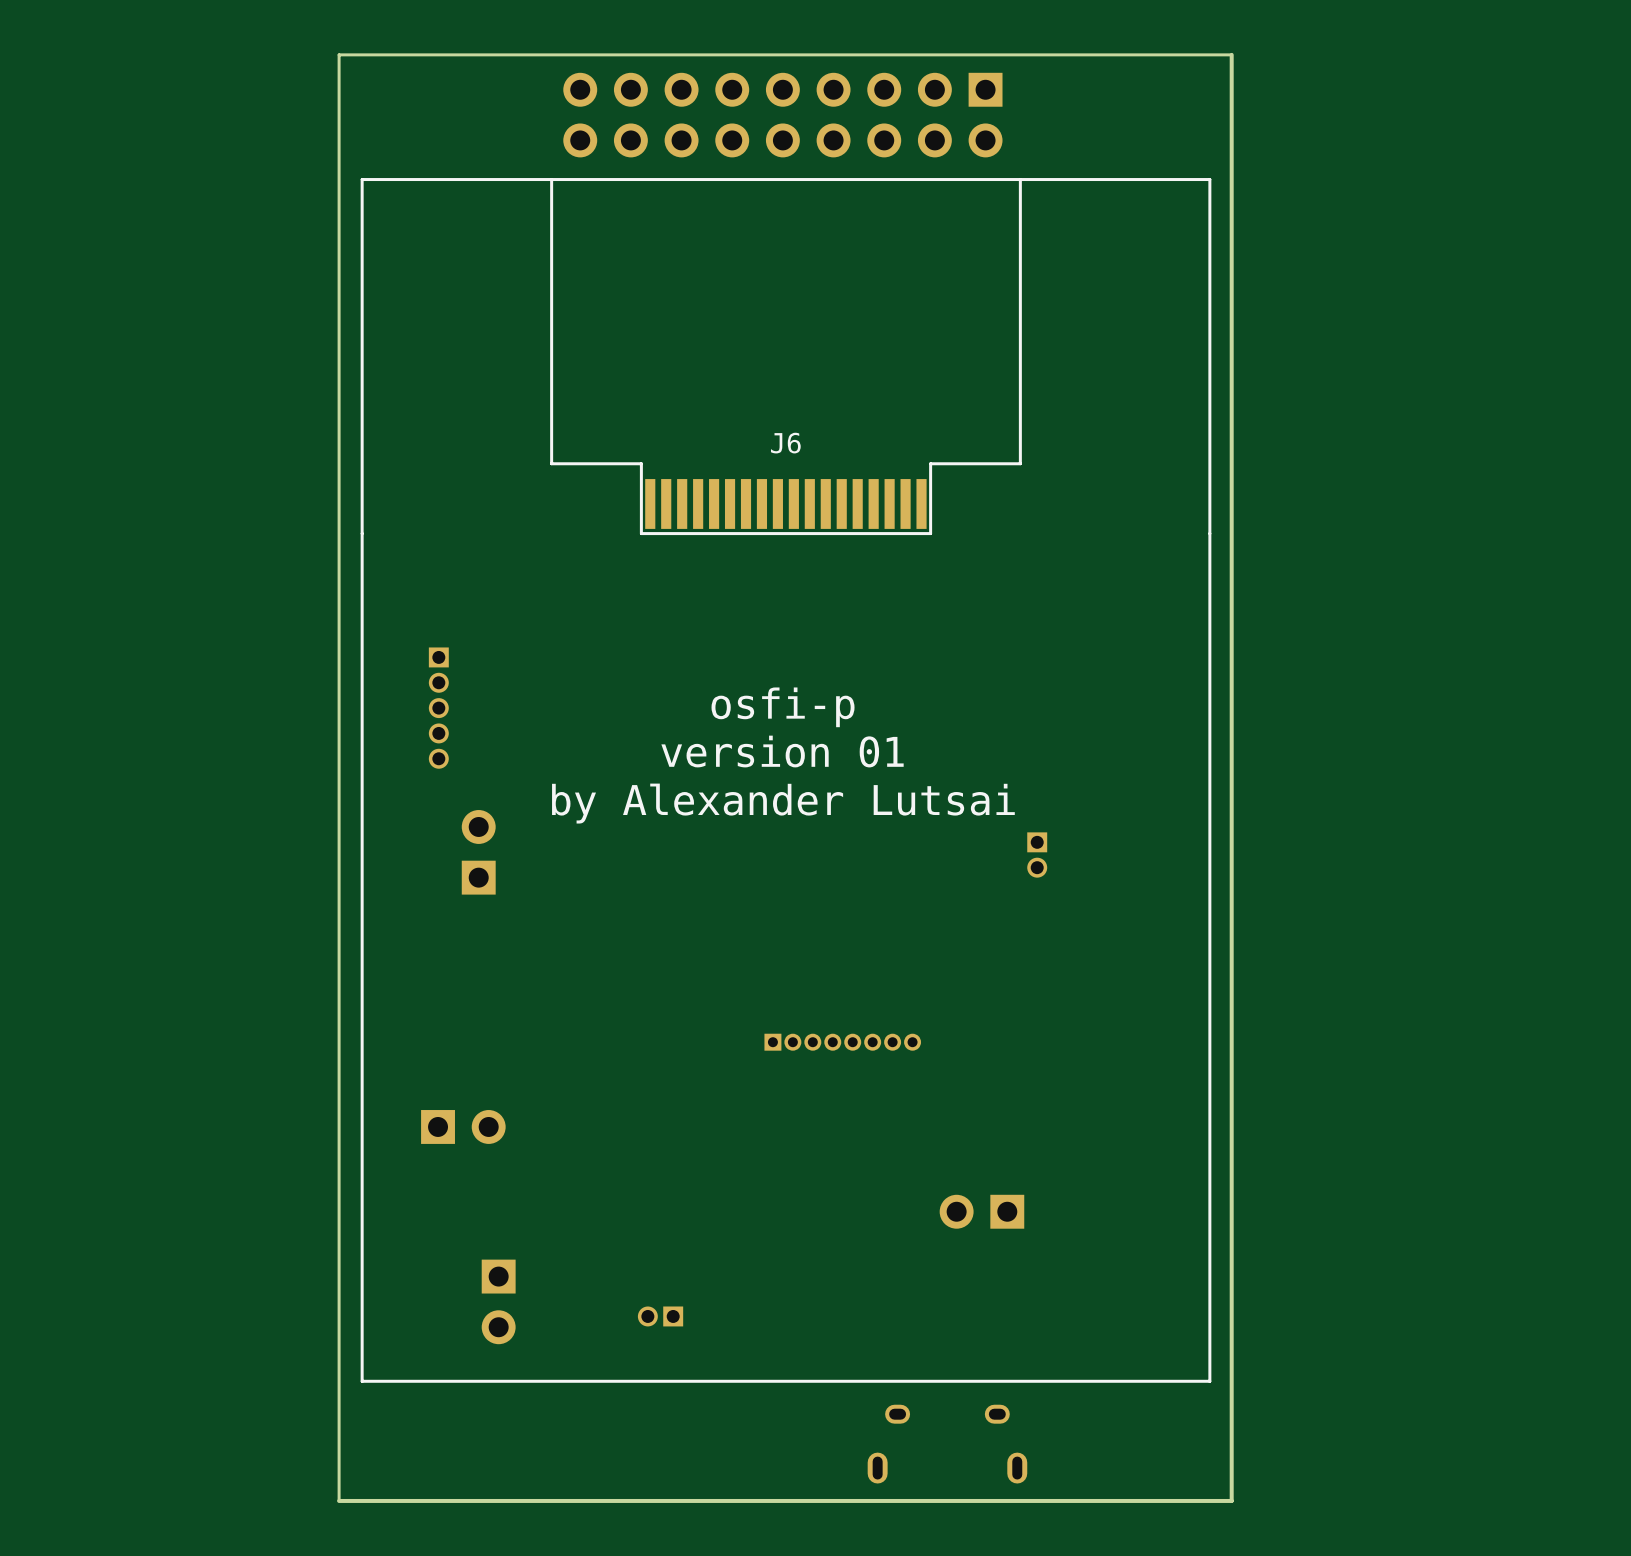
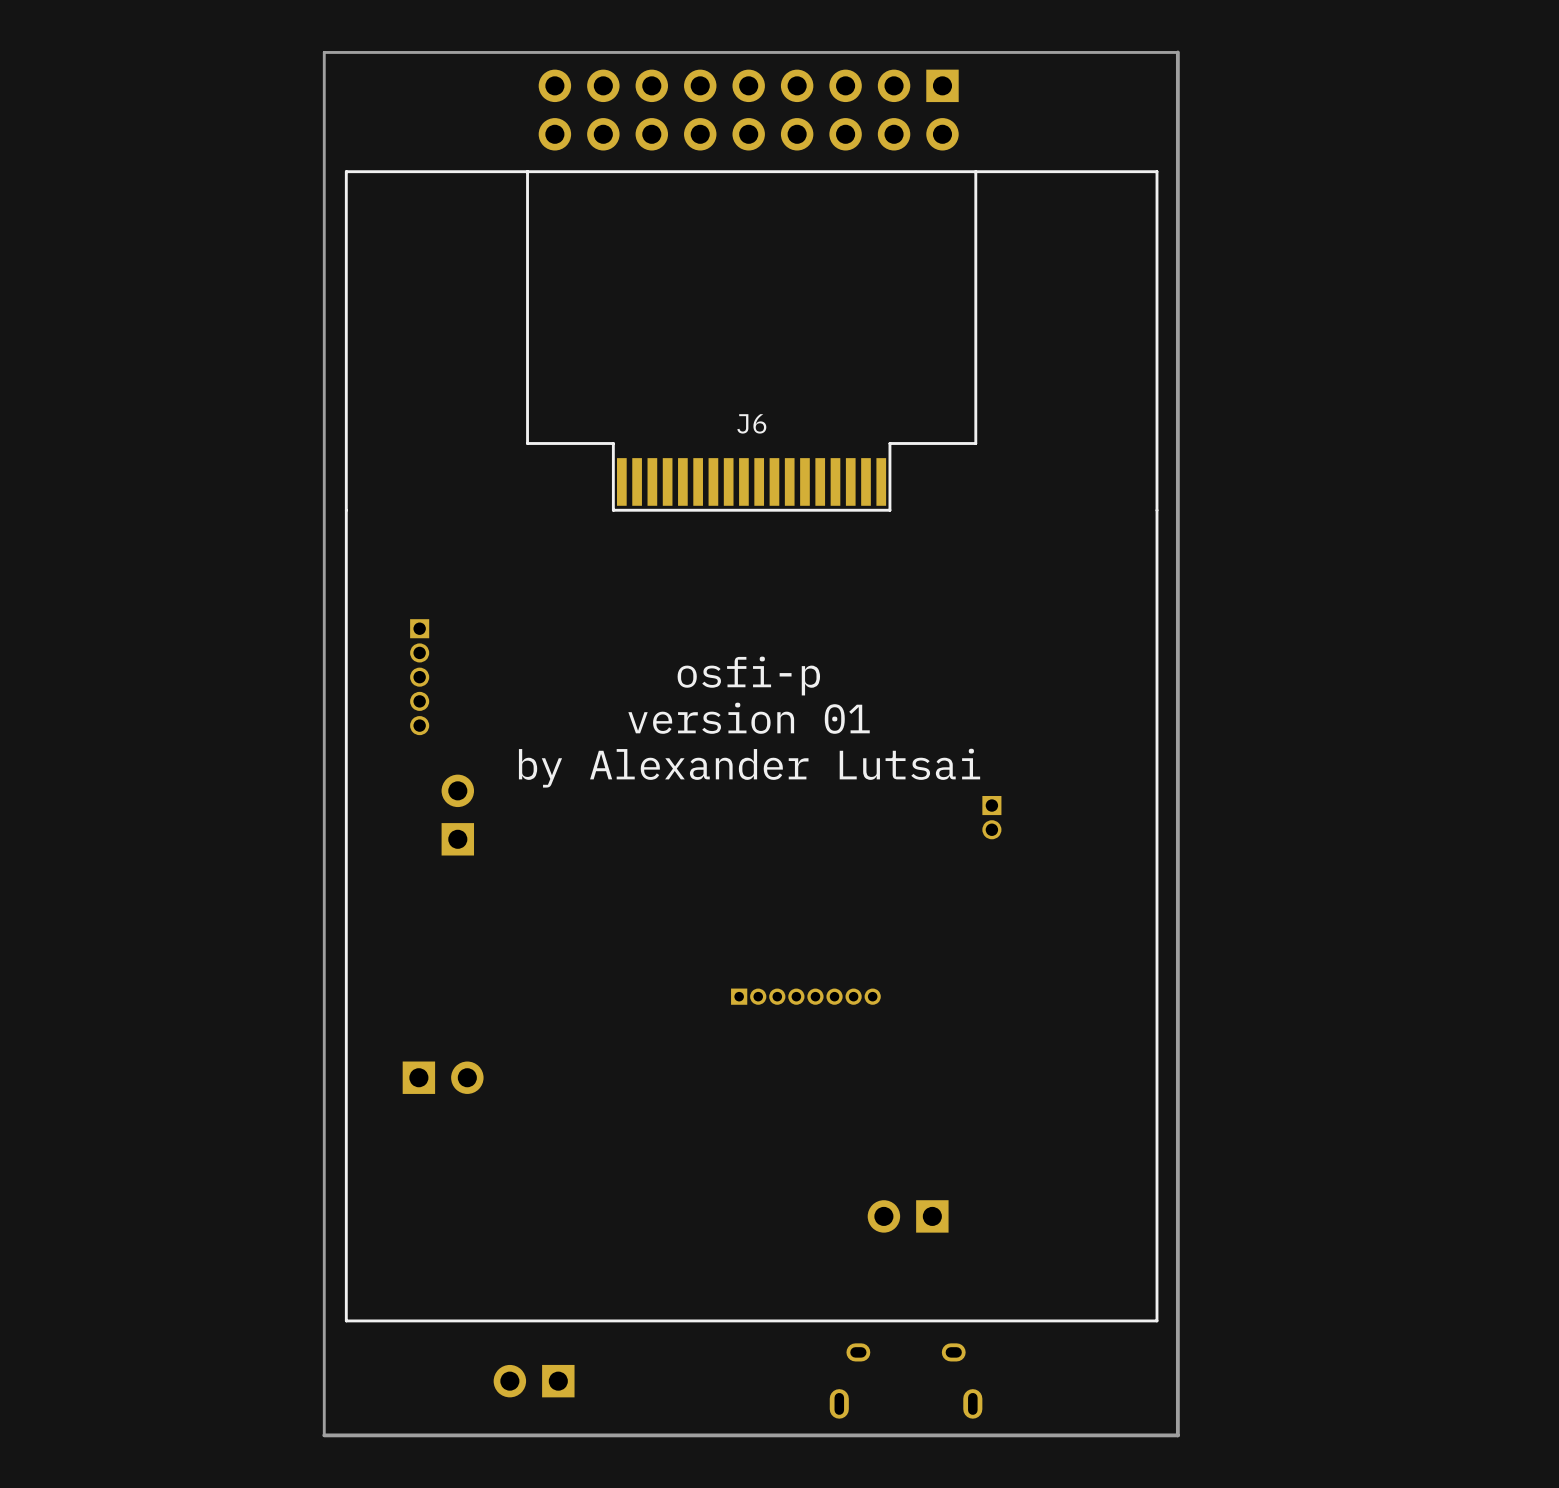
part position: (981, 1211) -> (908, 1216)
part rotation: 0° (498, 1301) -> 90° clockwise (534, 1381)
part position: (498, 1301) -> (534, 1381)
part: (660, 1316) -> none

